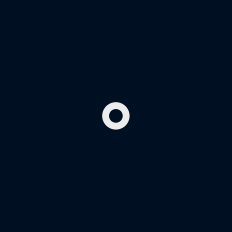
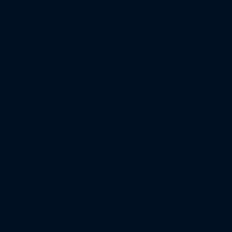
via: (115, 115) -> none

